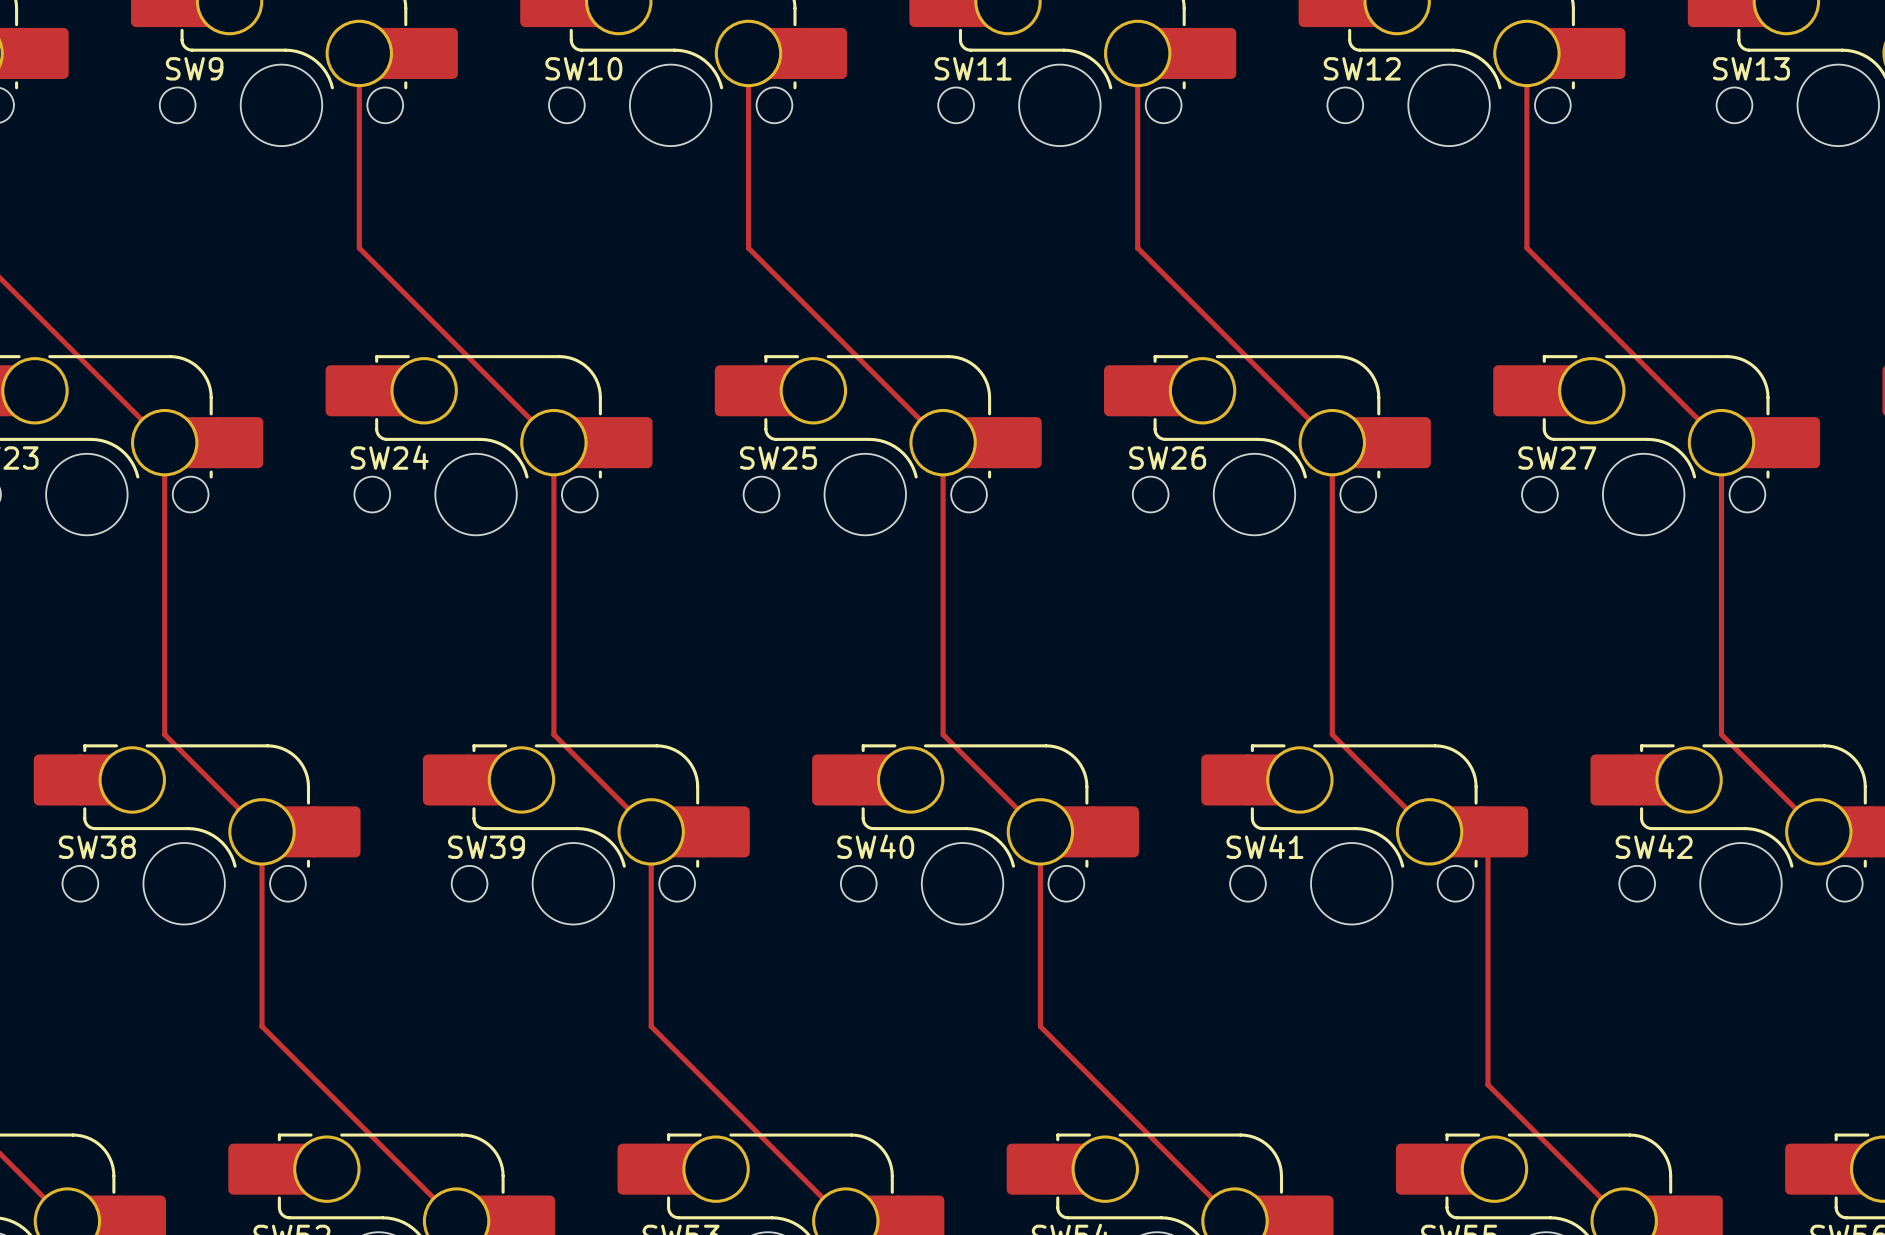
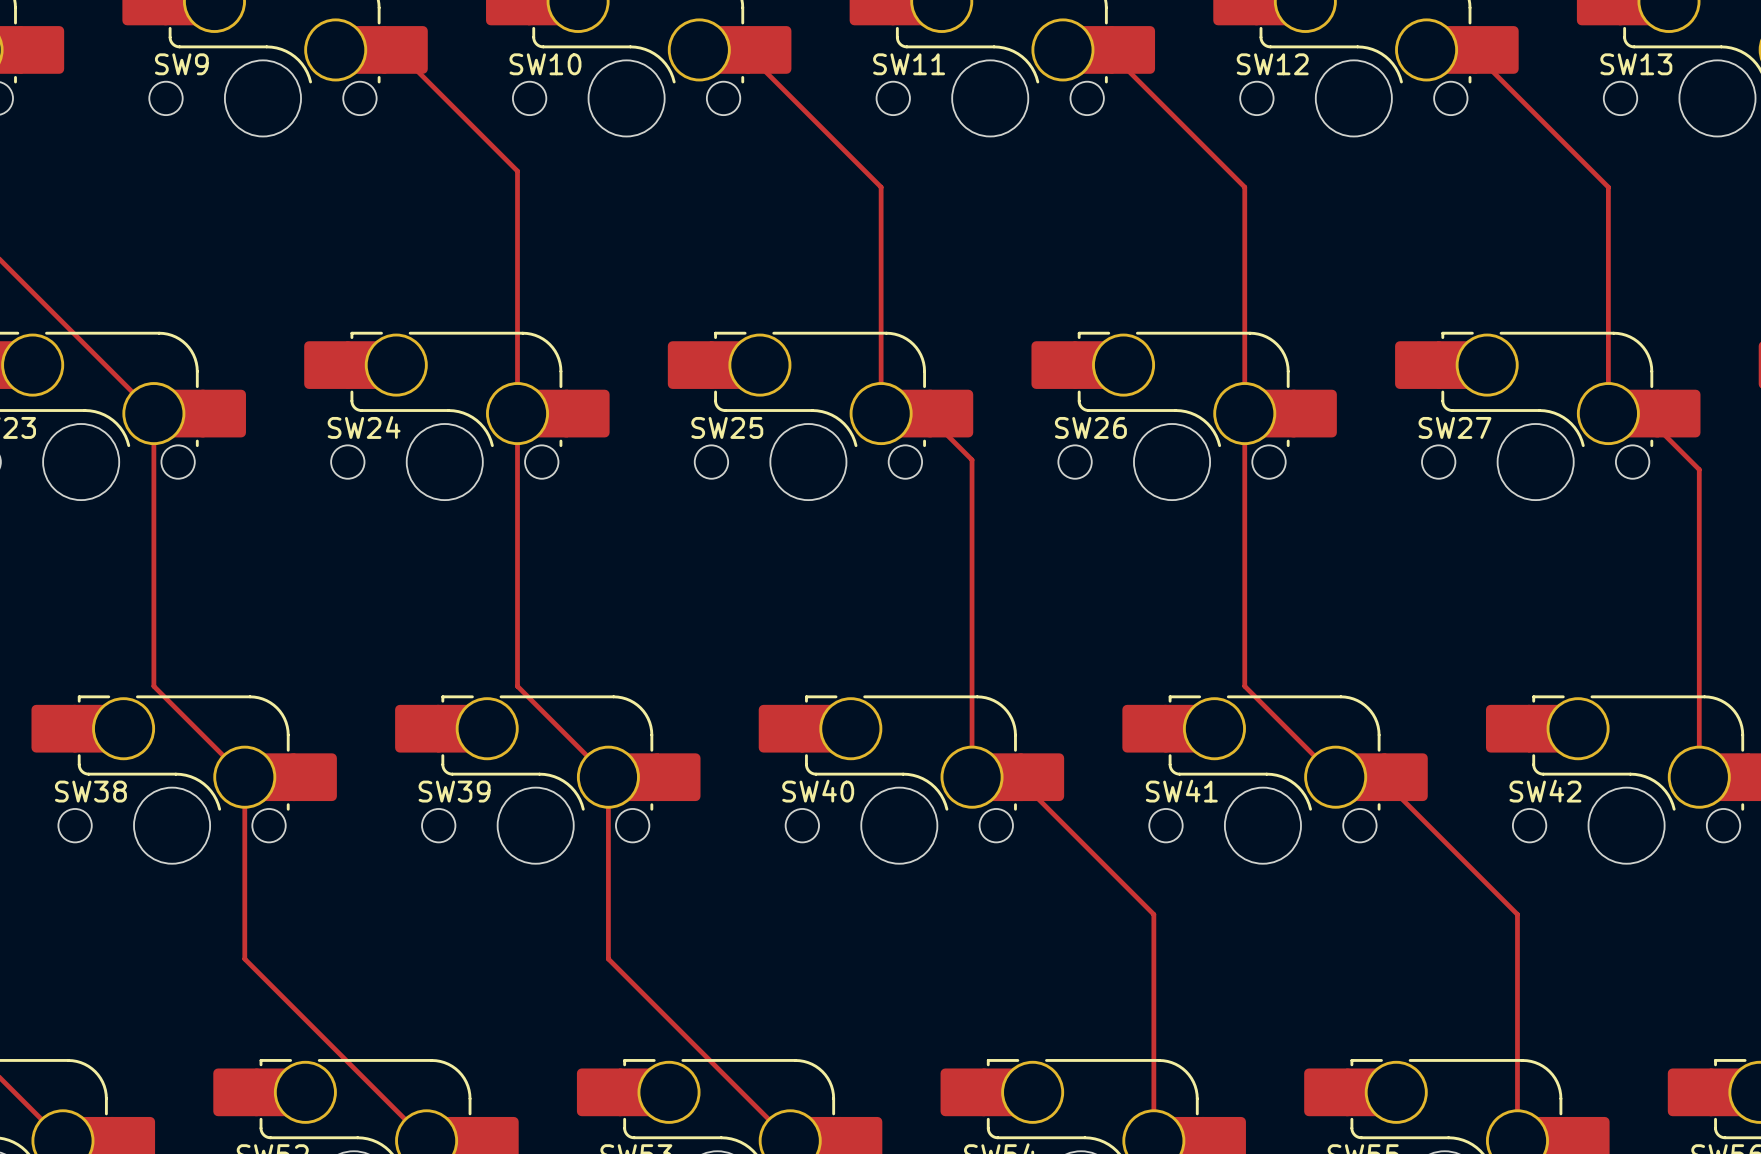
top track: (359, 53) (359, 248) (553, 442) -> (335, 49) (396, 49) (517, 171) (517, 413)
top track: (748, 53) (748, 248) (943, 442) (943, 734) (1040, 831) (1040, 1026) (1235, 1221) -> (699, 49) (743, 49) (881, 187) (881, 413) (925, 413) (972, 459) (972, 777) (1016, 777) (1153, 914) (1153, 1140)
top track: (1137, 53) (1137, 248) (1332, 442) -> (1062, 49) (1107, 49) (1244, 187) (1244, 413)
top track: (1526, 53) (1526, 248) (1721, 442) (1721, 734) (1818, 831) -> (1426, 49) (1471, 49) (1608, 187) (1608, 413)
top track: none -> (1643, 413) (1699, 469) (1699, 777)
top track: (1487, 842) (1487, 1084) (1624, 1221) -> (1390, 787) (1517, 914) (1517, 1140)

